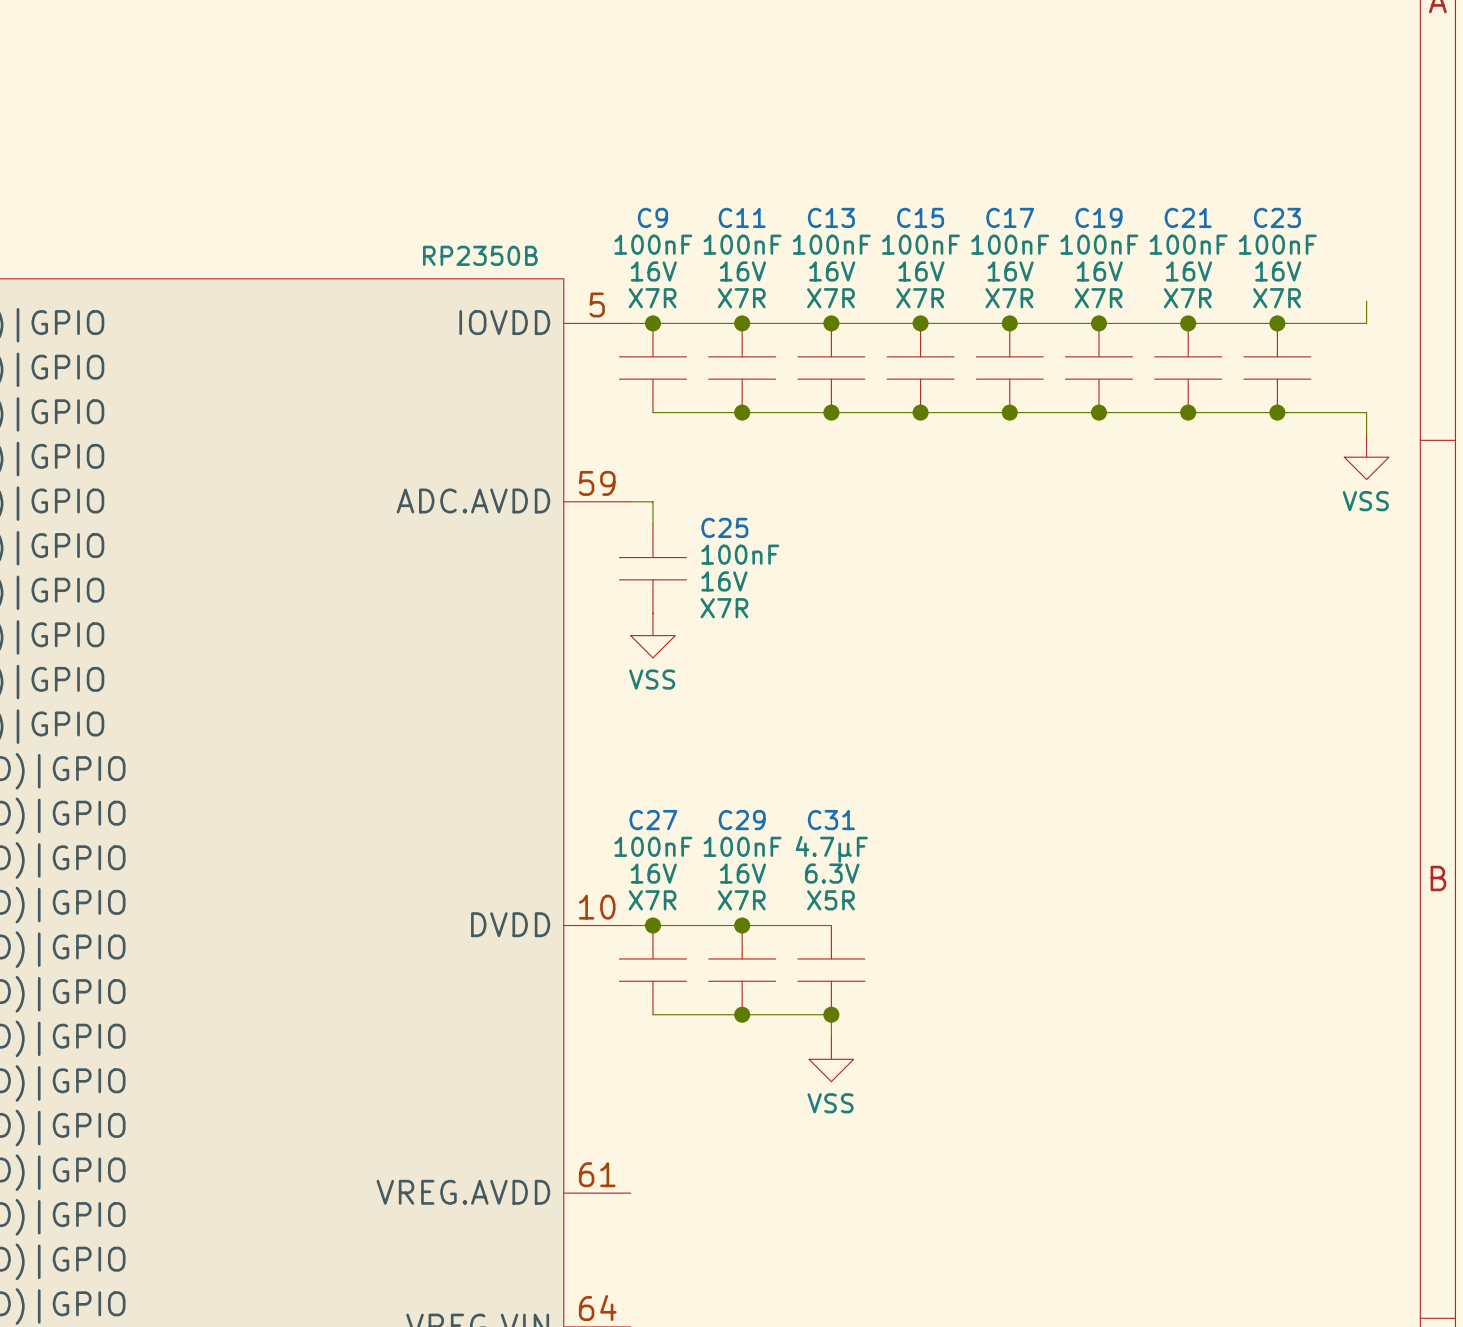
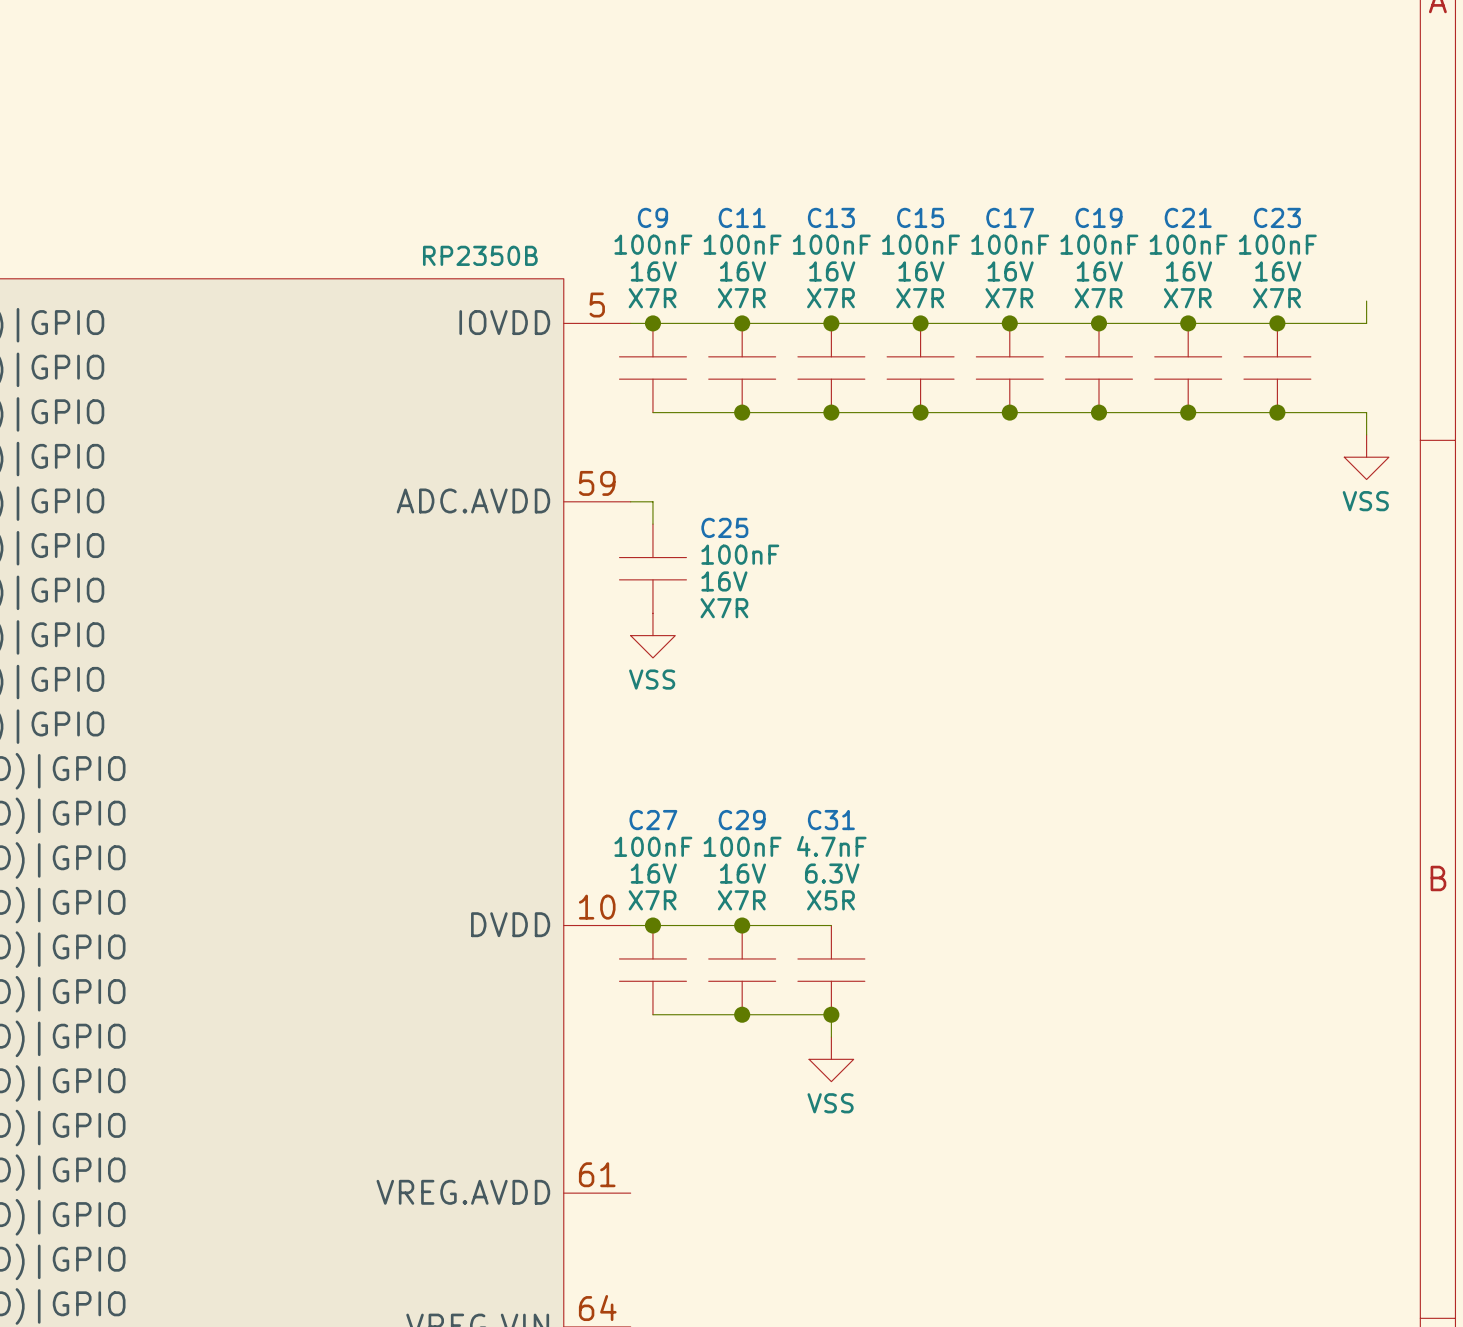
C31 text: 4.7µF (831, 849) -> 4.7nF (831, 846)

